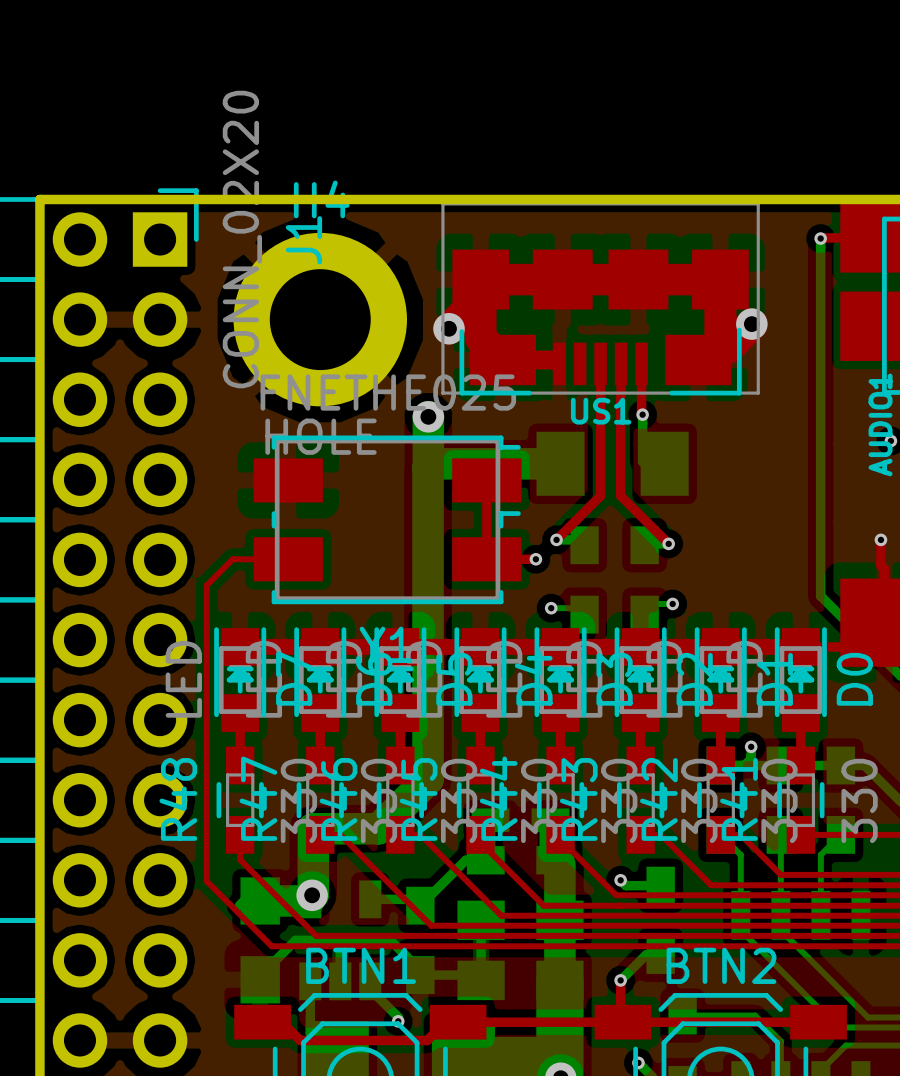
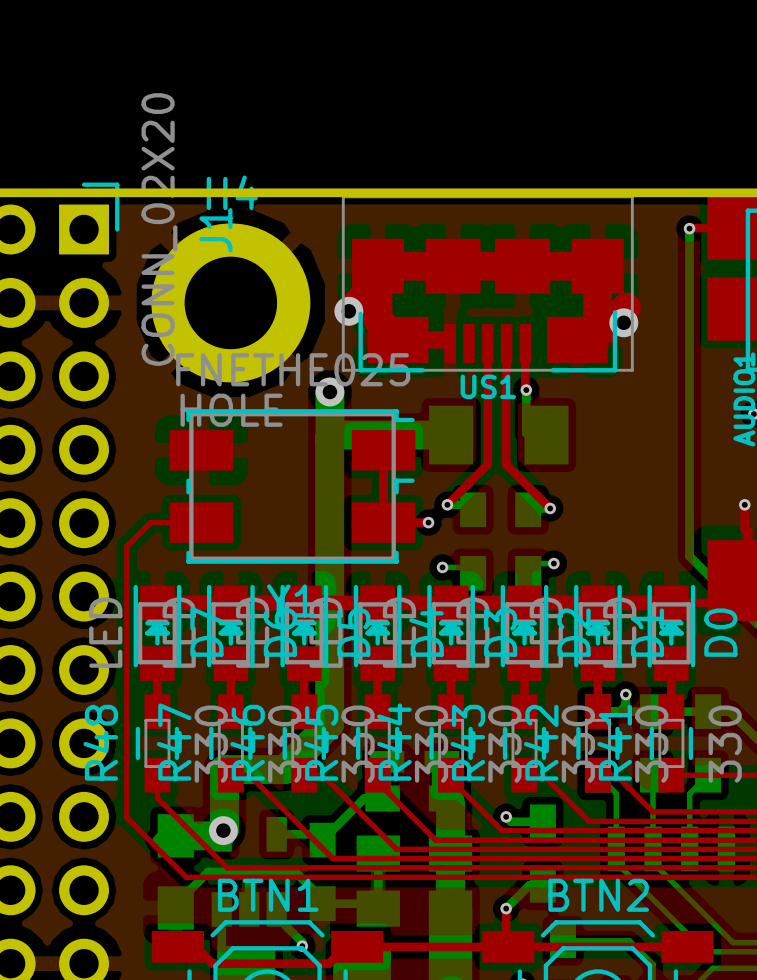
via position: (751, 324) -> (623, 322)

